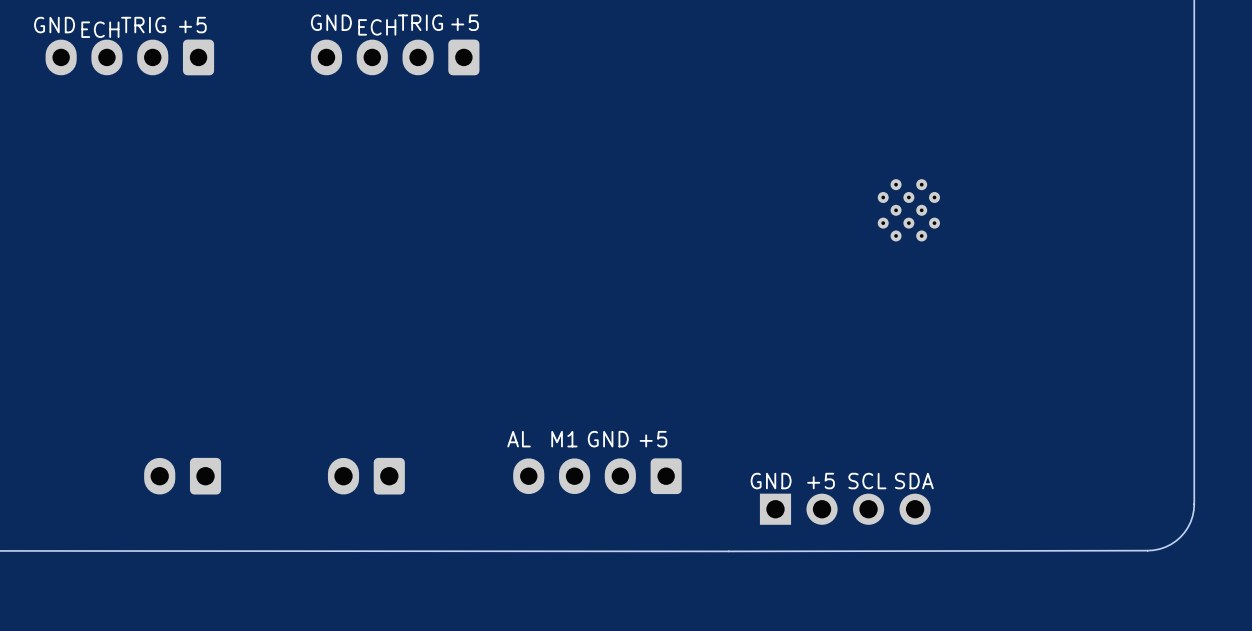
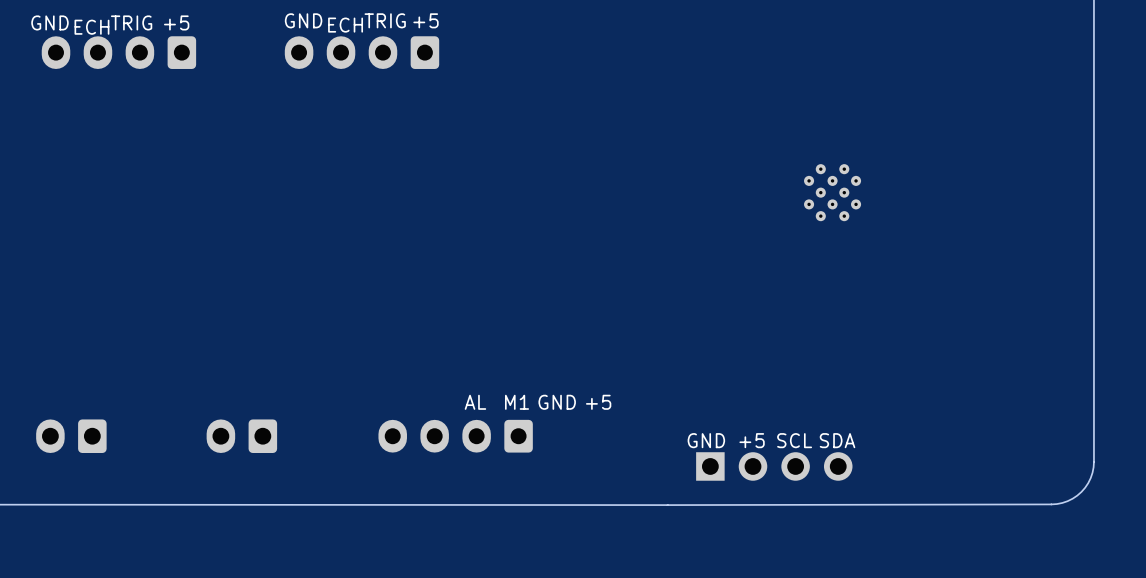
part: none -> (71, 436)
part: (182, 476) -> none
part: none -> (241, 436)
part: (366, 476) -> none
part position: (597, 476) -> (455, 436)

